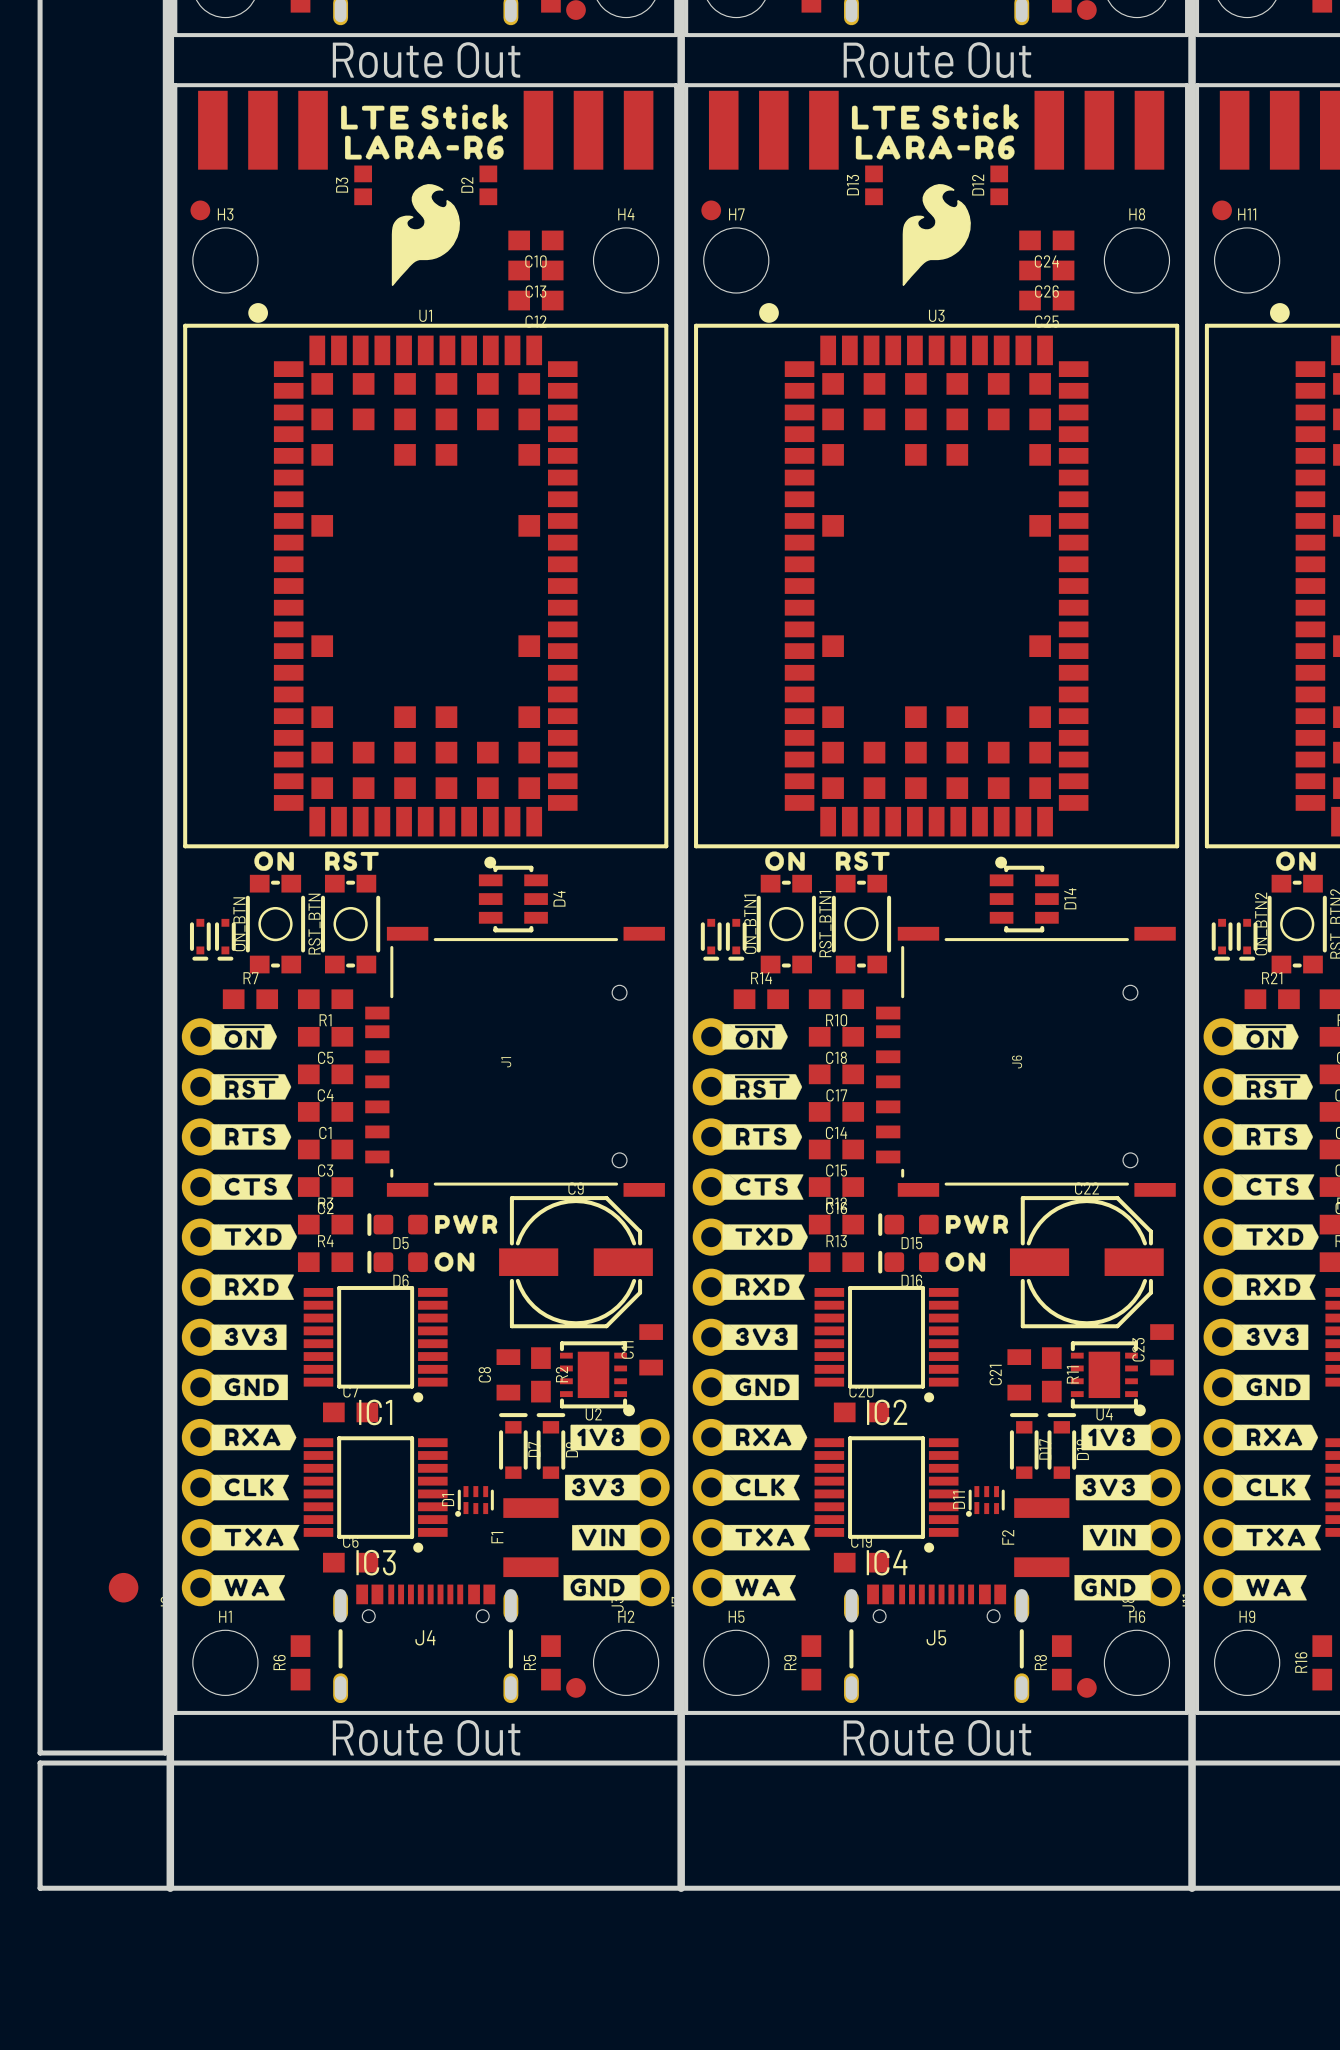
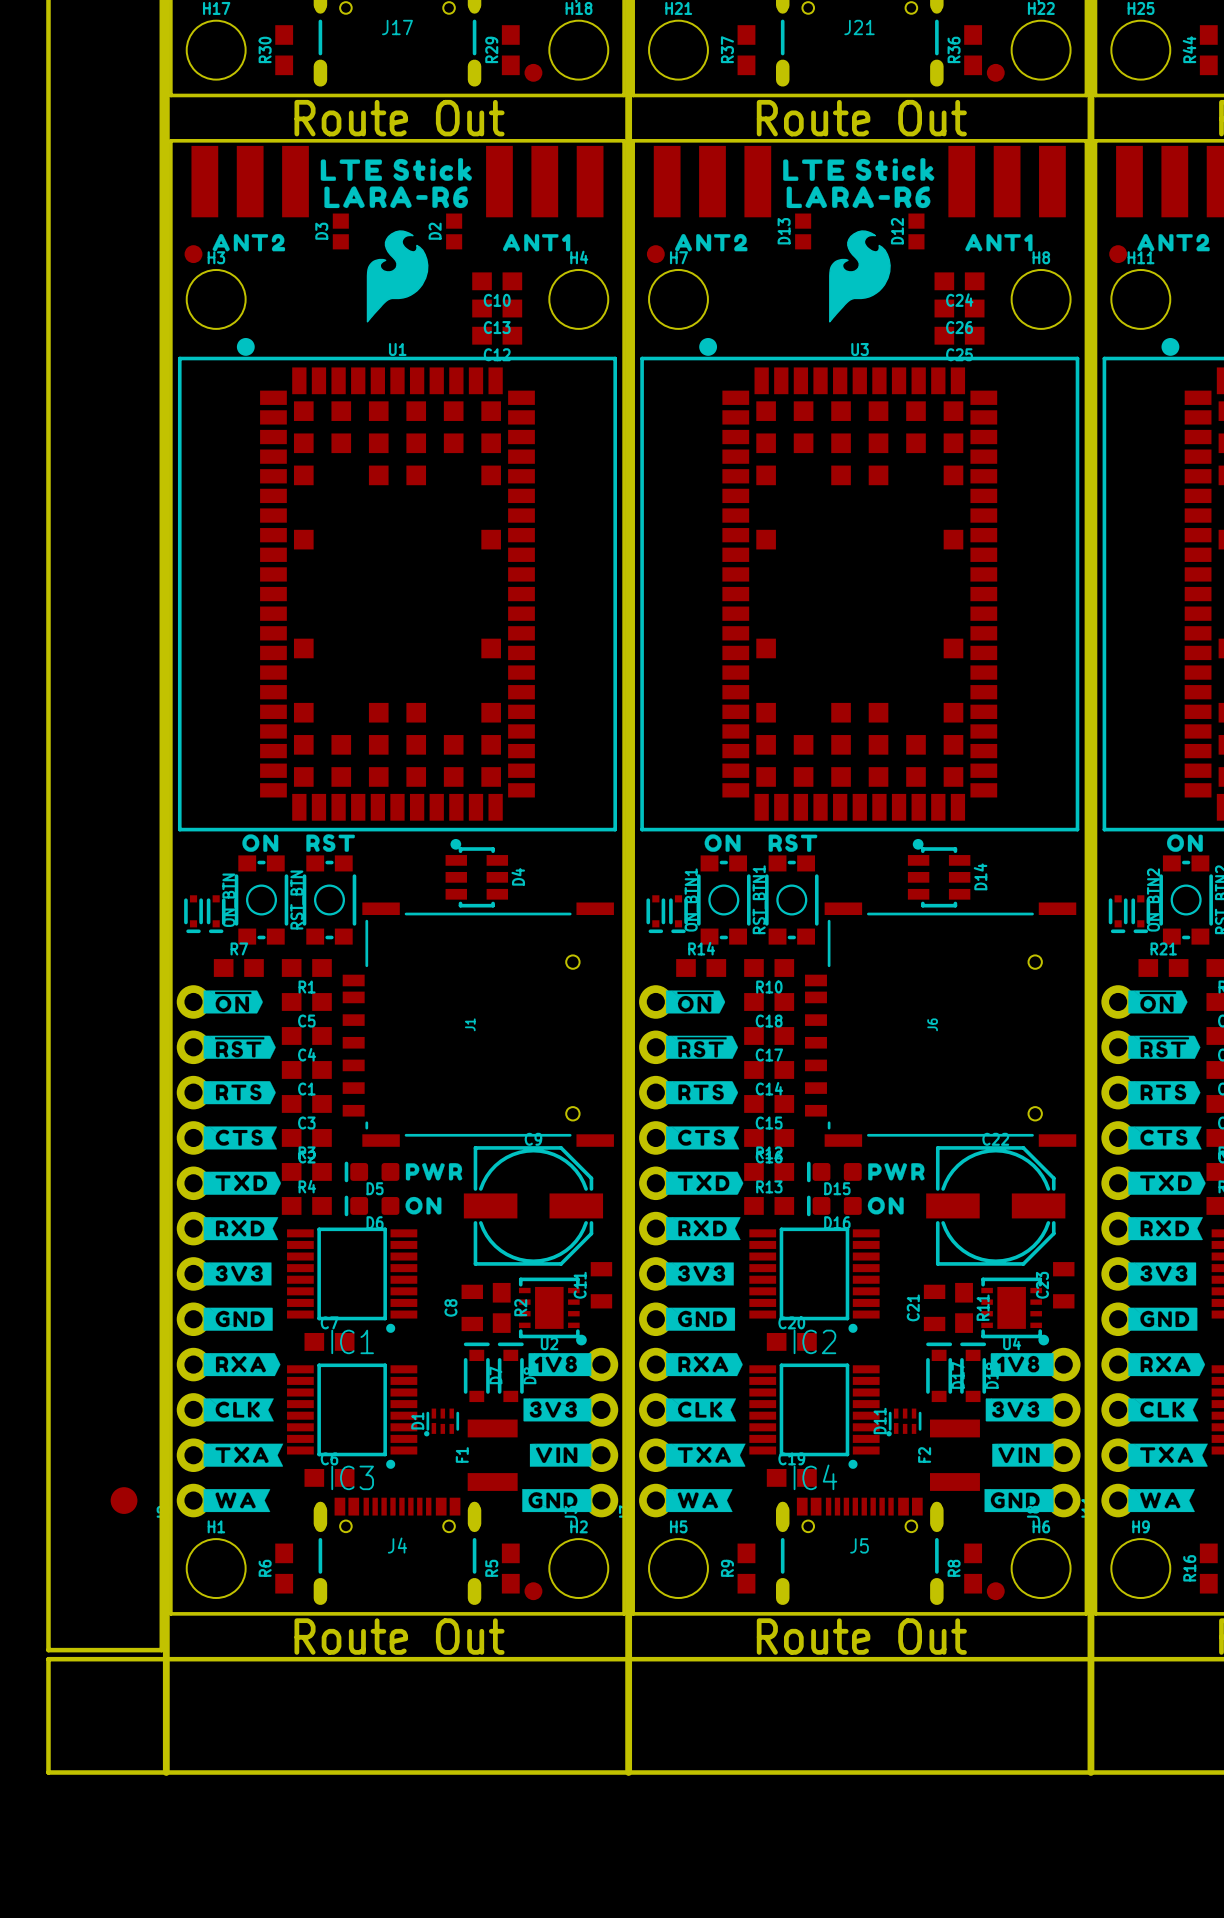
drawing: none -> [212, 233, 286, 252]
drawing: none -> [502, 233, 571, 252]
drawing: none -> [674, 233, 748, 252]
drawing: none -> [965, 233, 1033, 252]
drawing: none -> [1137, 233, 1210, 252]

